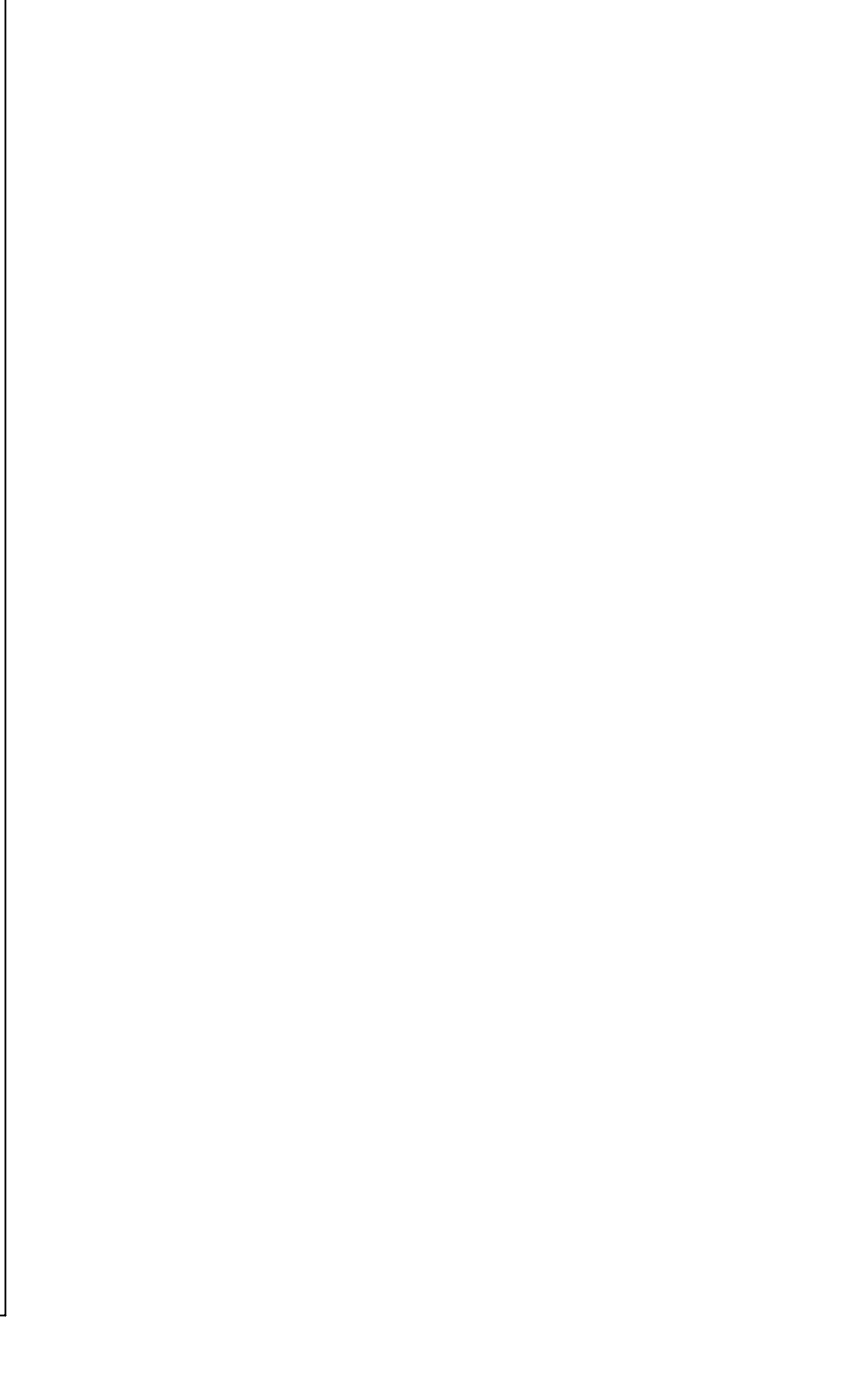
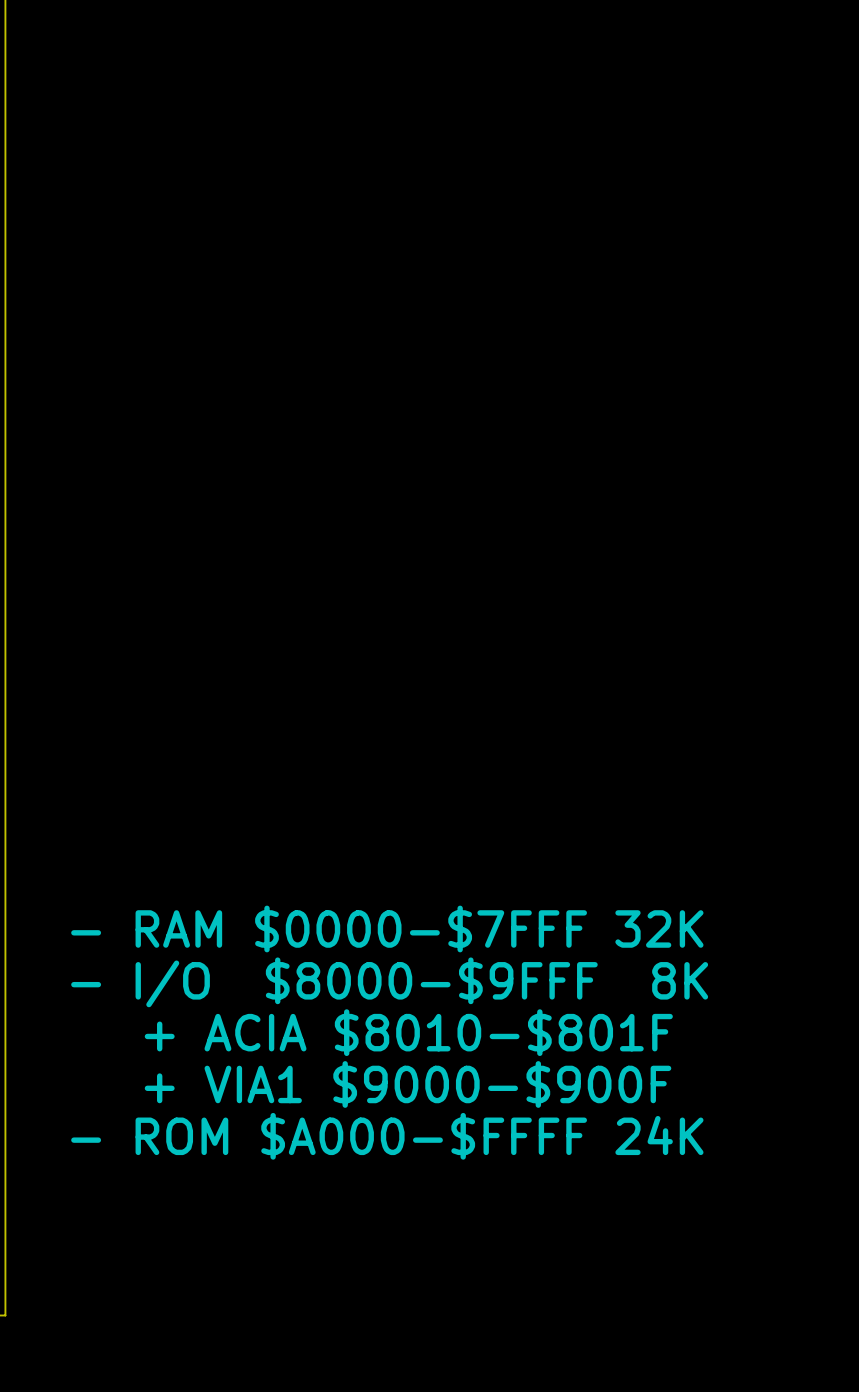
text: none -> - RAM $0000-$7FFF 32K (387, 928)
text: none -> - I/O $8000-$9FFF 8K (389, 982)
text: none -> + ACIA $8010-$801F (408, 1032)
text: none -> + VIA1 $9000-$900F (408, 1084)
text: none -> - ROM $A000-$FFFF 24K (387, 1136)

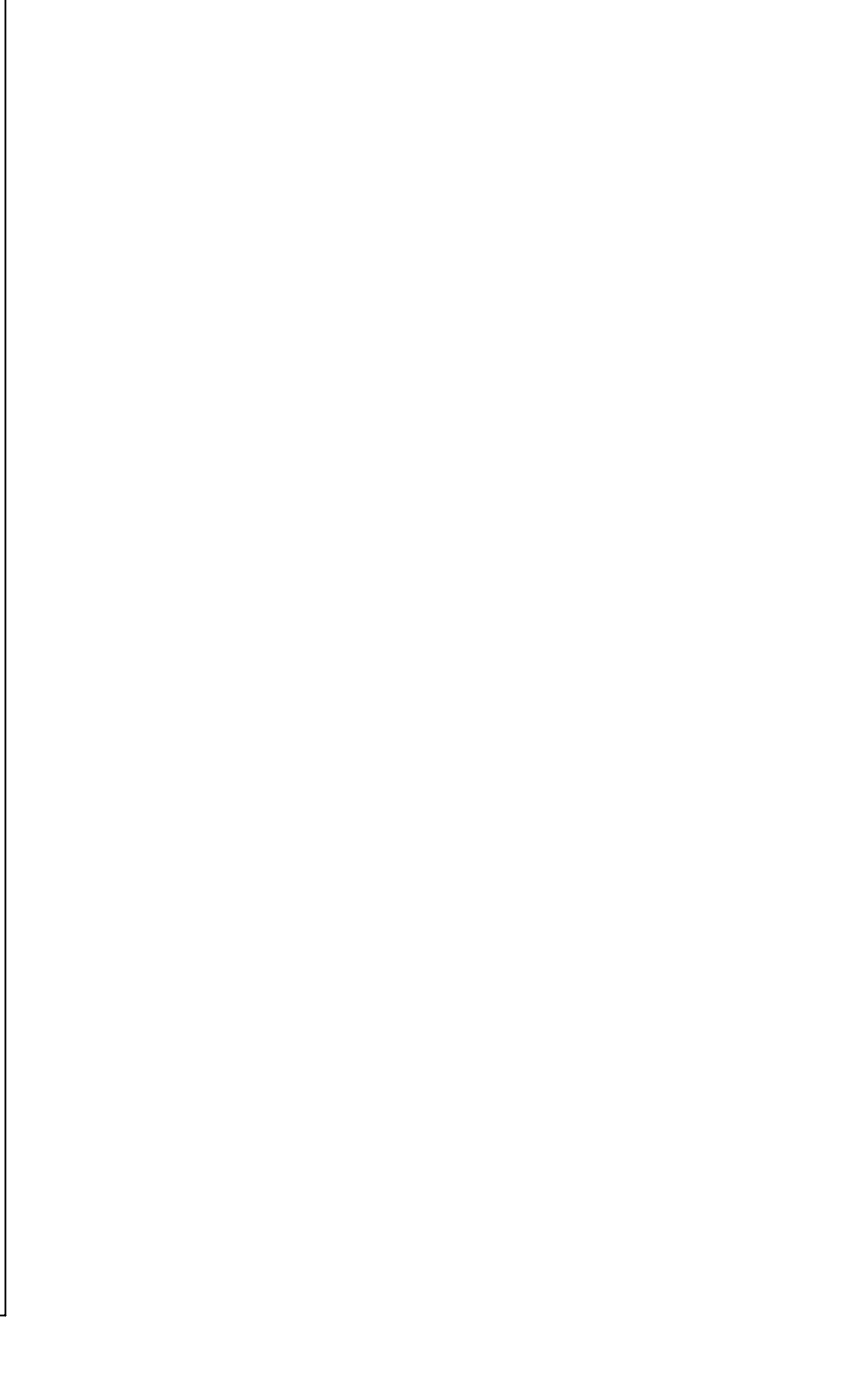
text: - RAM $0000-$7FFF 32K (387, 928) -> none
text: - I/O $8000-$9FFF 8K (389, 982) -> none
text: + ACIA $8010-$801F (408, 1032) -> none
text: + VIA1 $9000-$900F (408, 1084) -> none
text: - ROM $A000-$FFFF 24K (387, 1136) -> none

